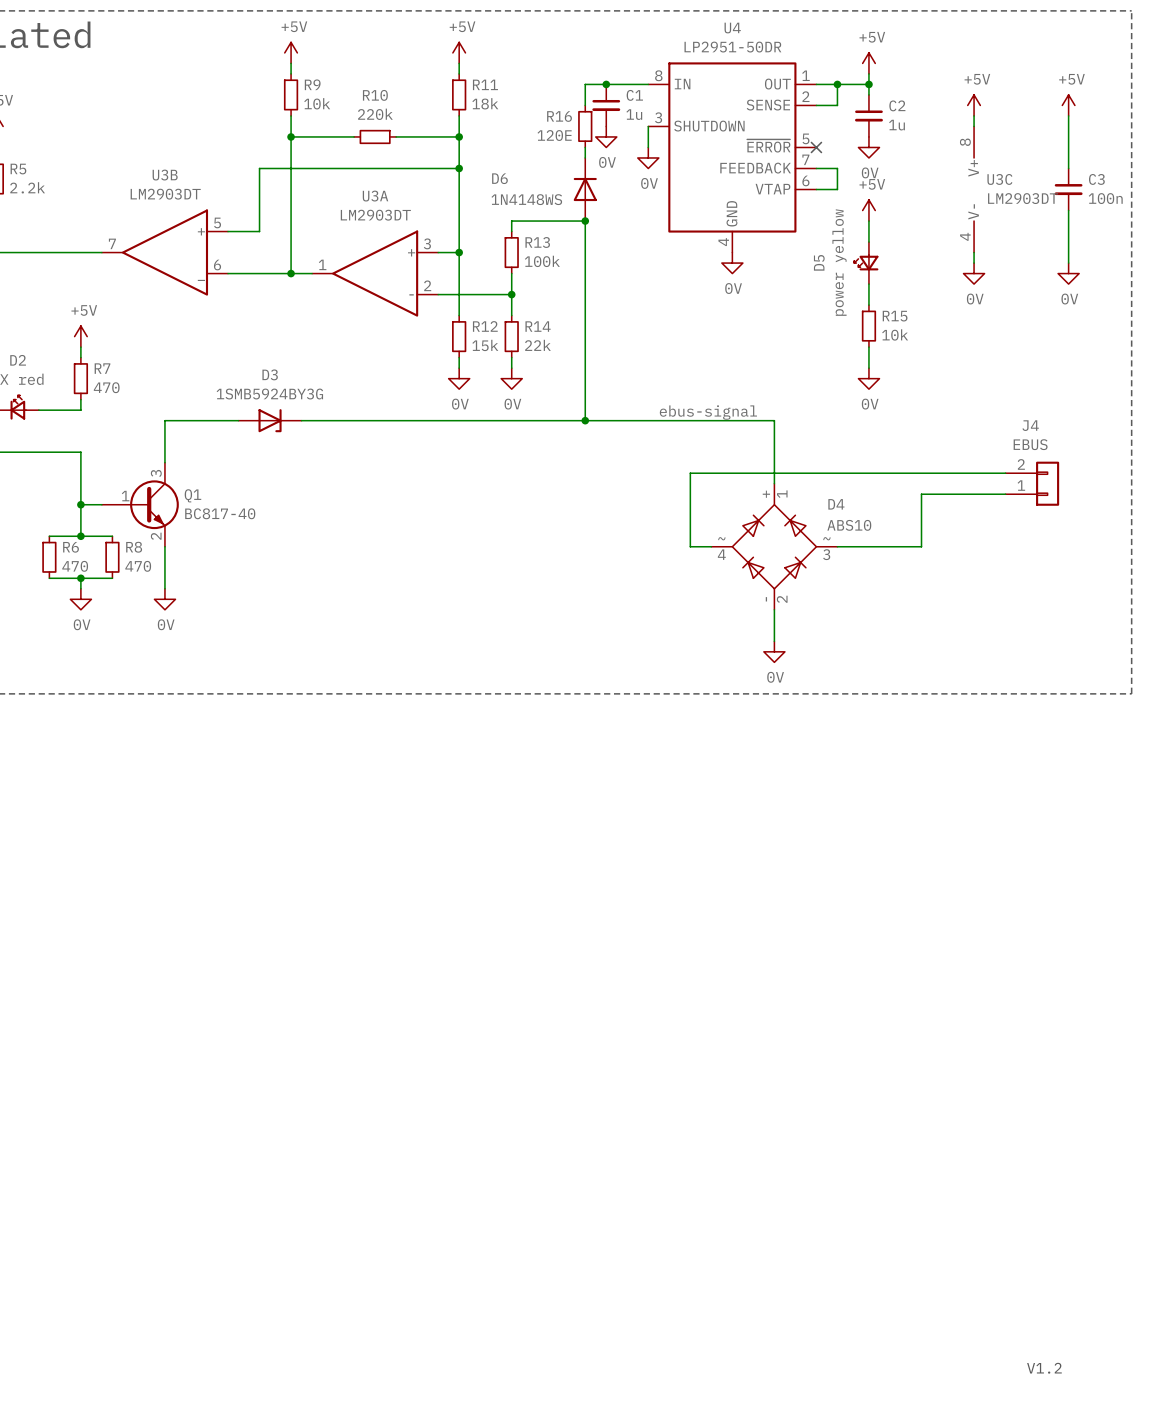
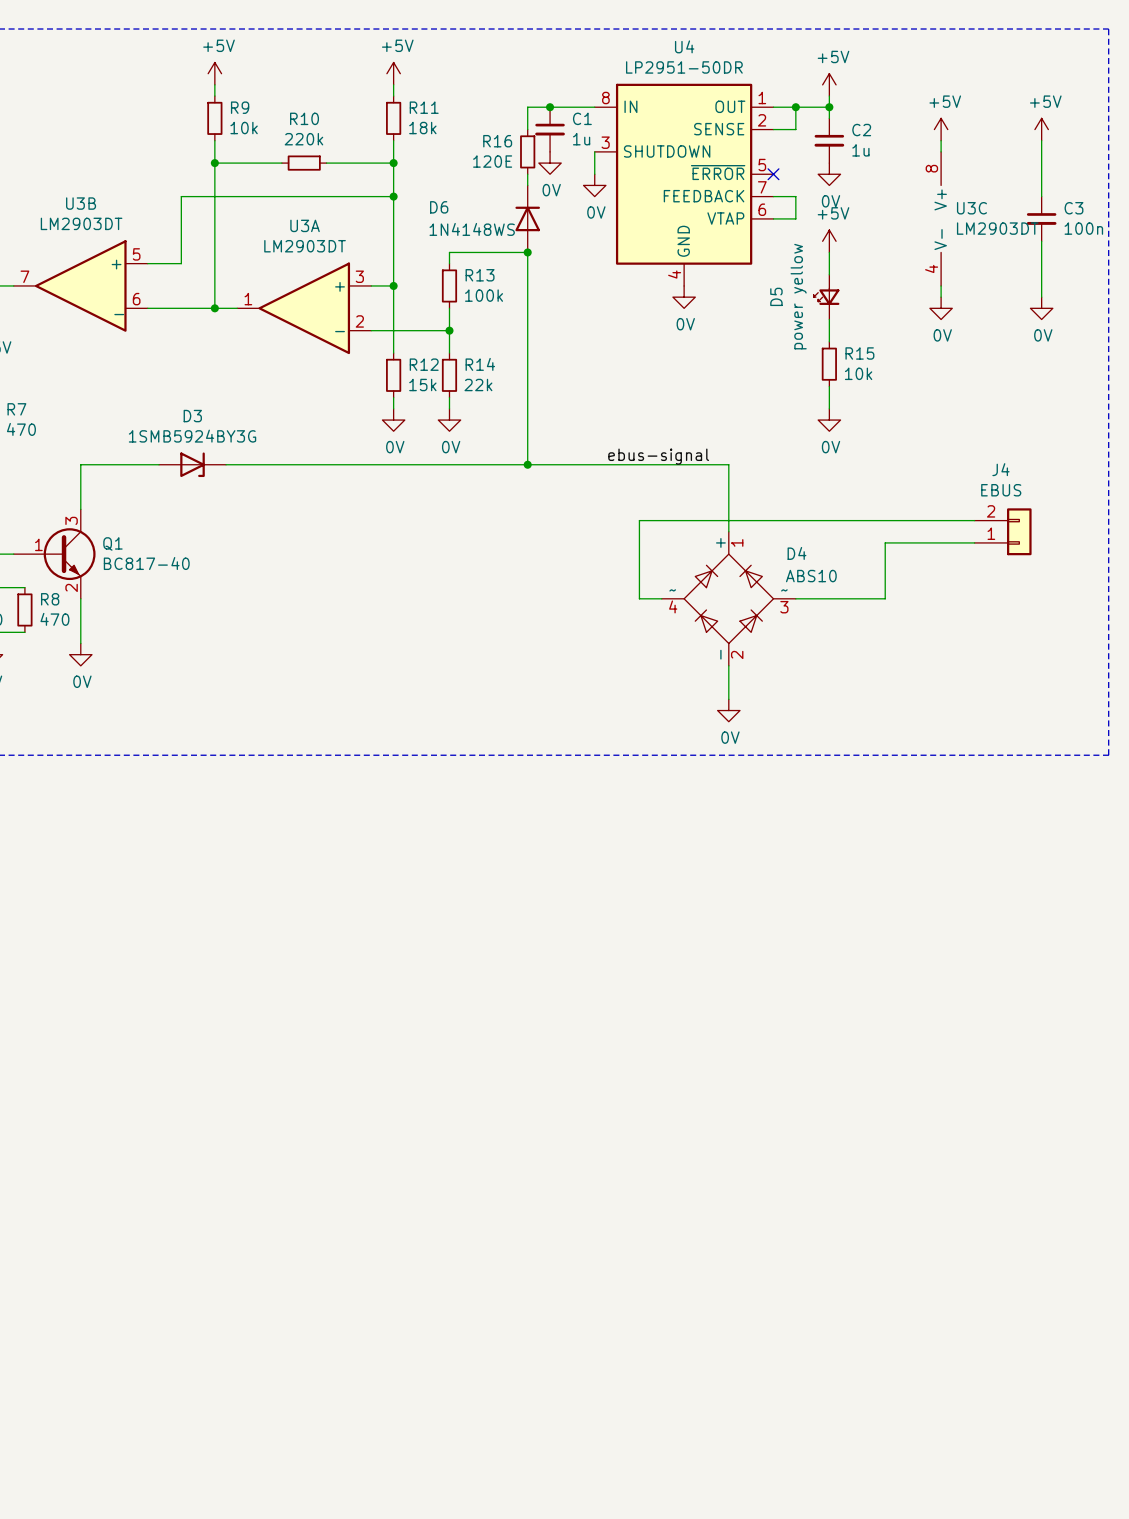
text: V1.2 (1044, 1368) -> none

